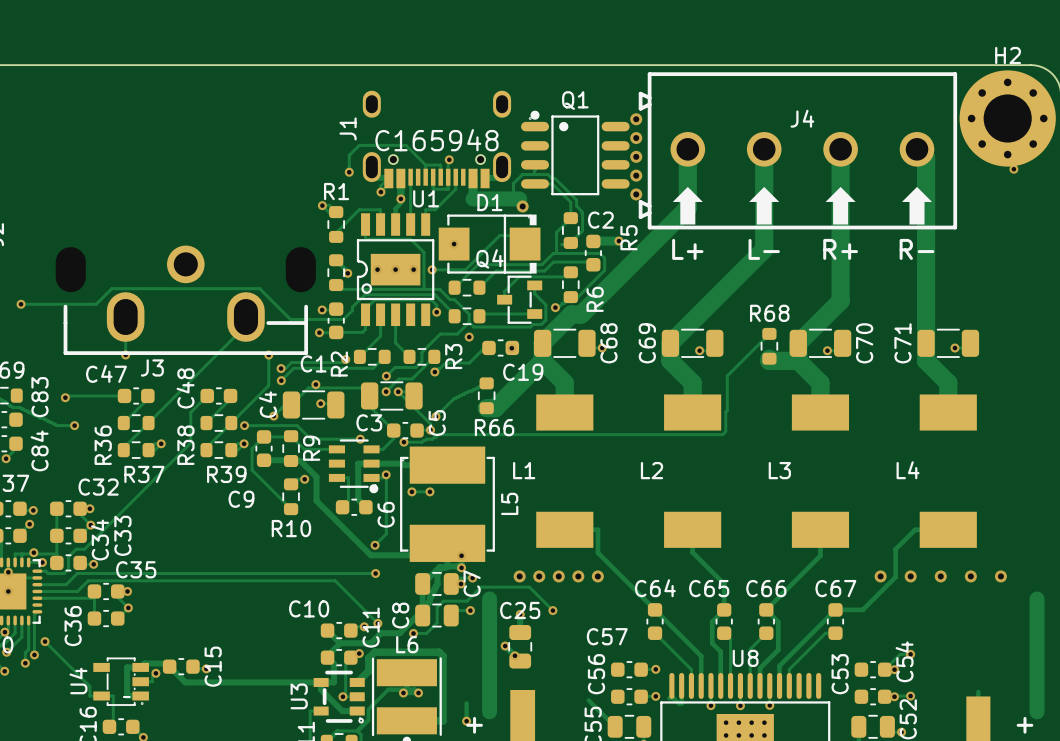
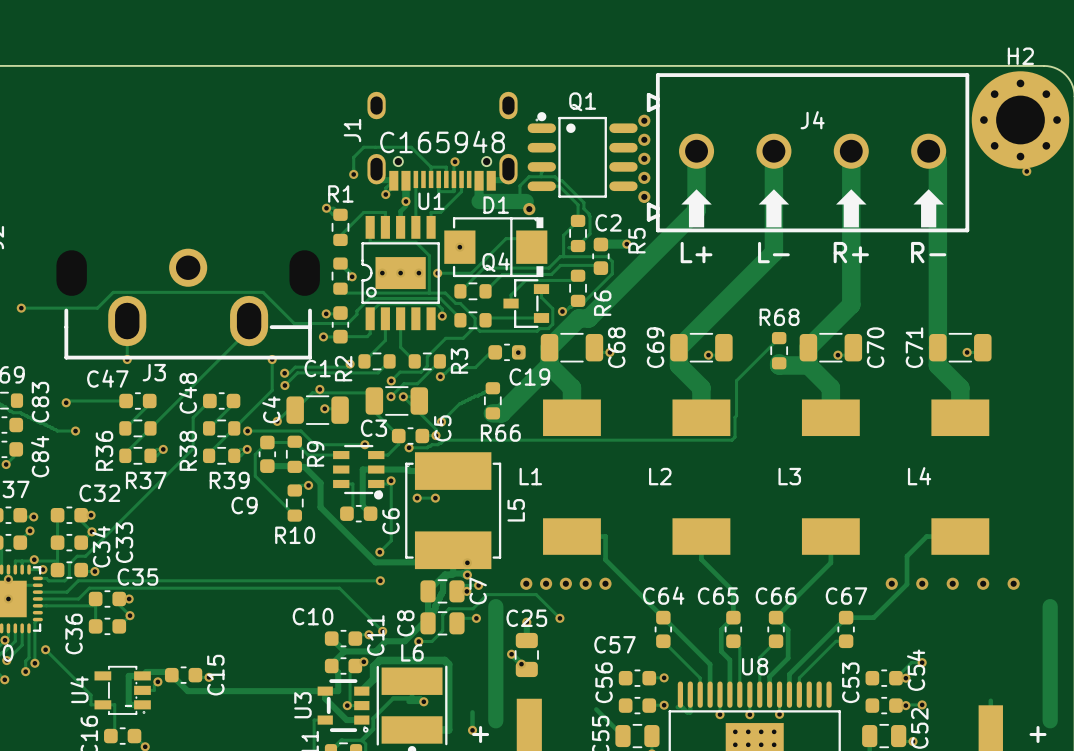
via: (469, 337) -> none
via: (403, 692) -> none

